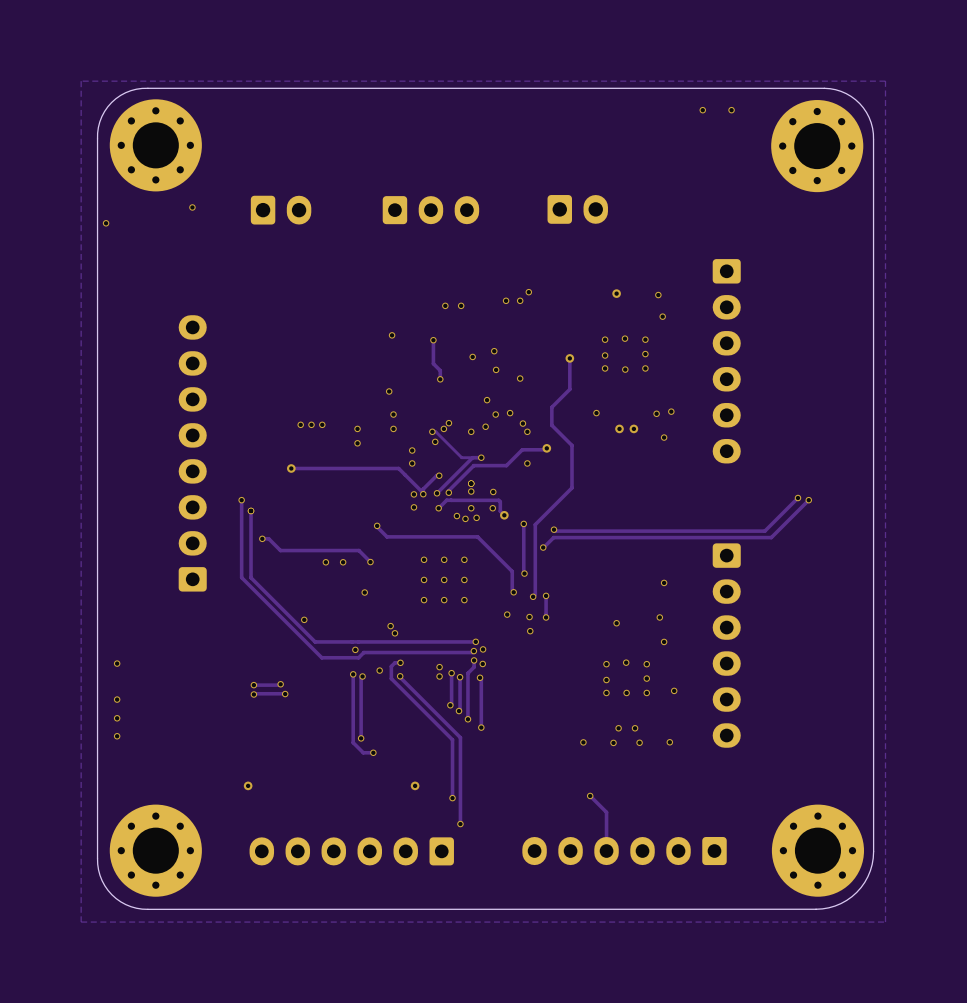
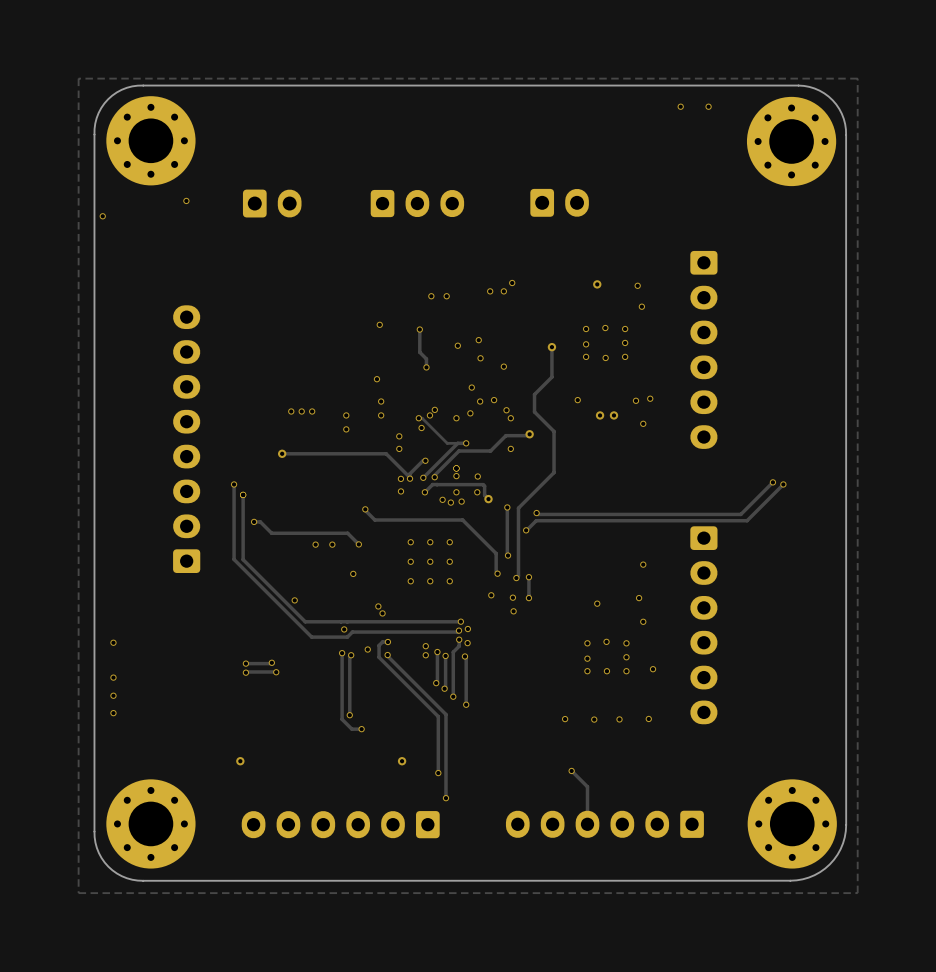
via: (618, 728) -> none
via: (635, 728) -> none

